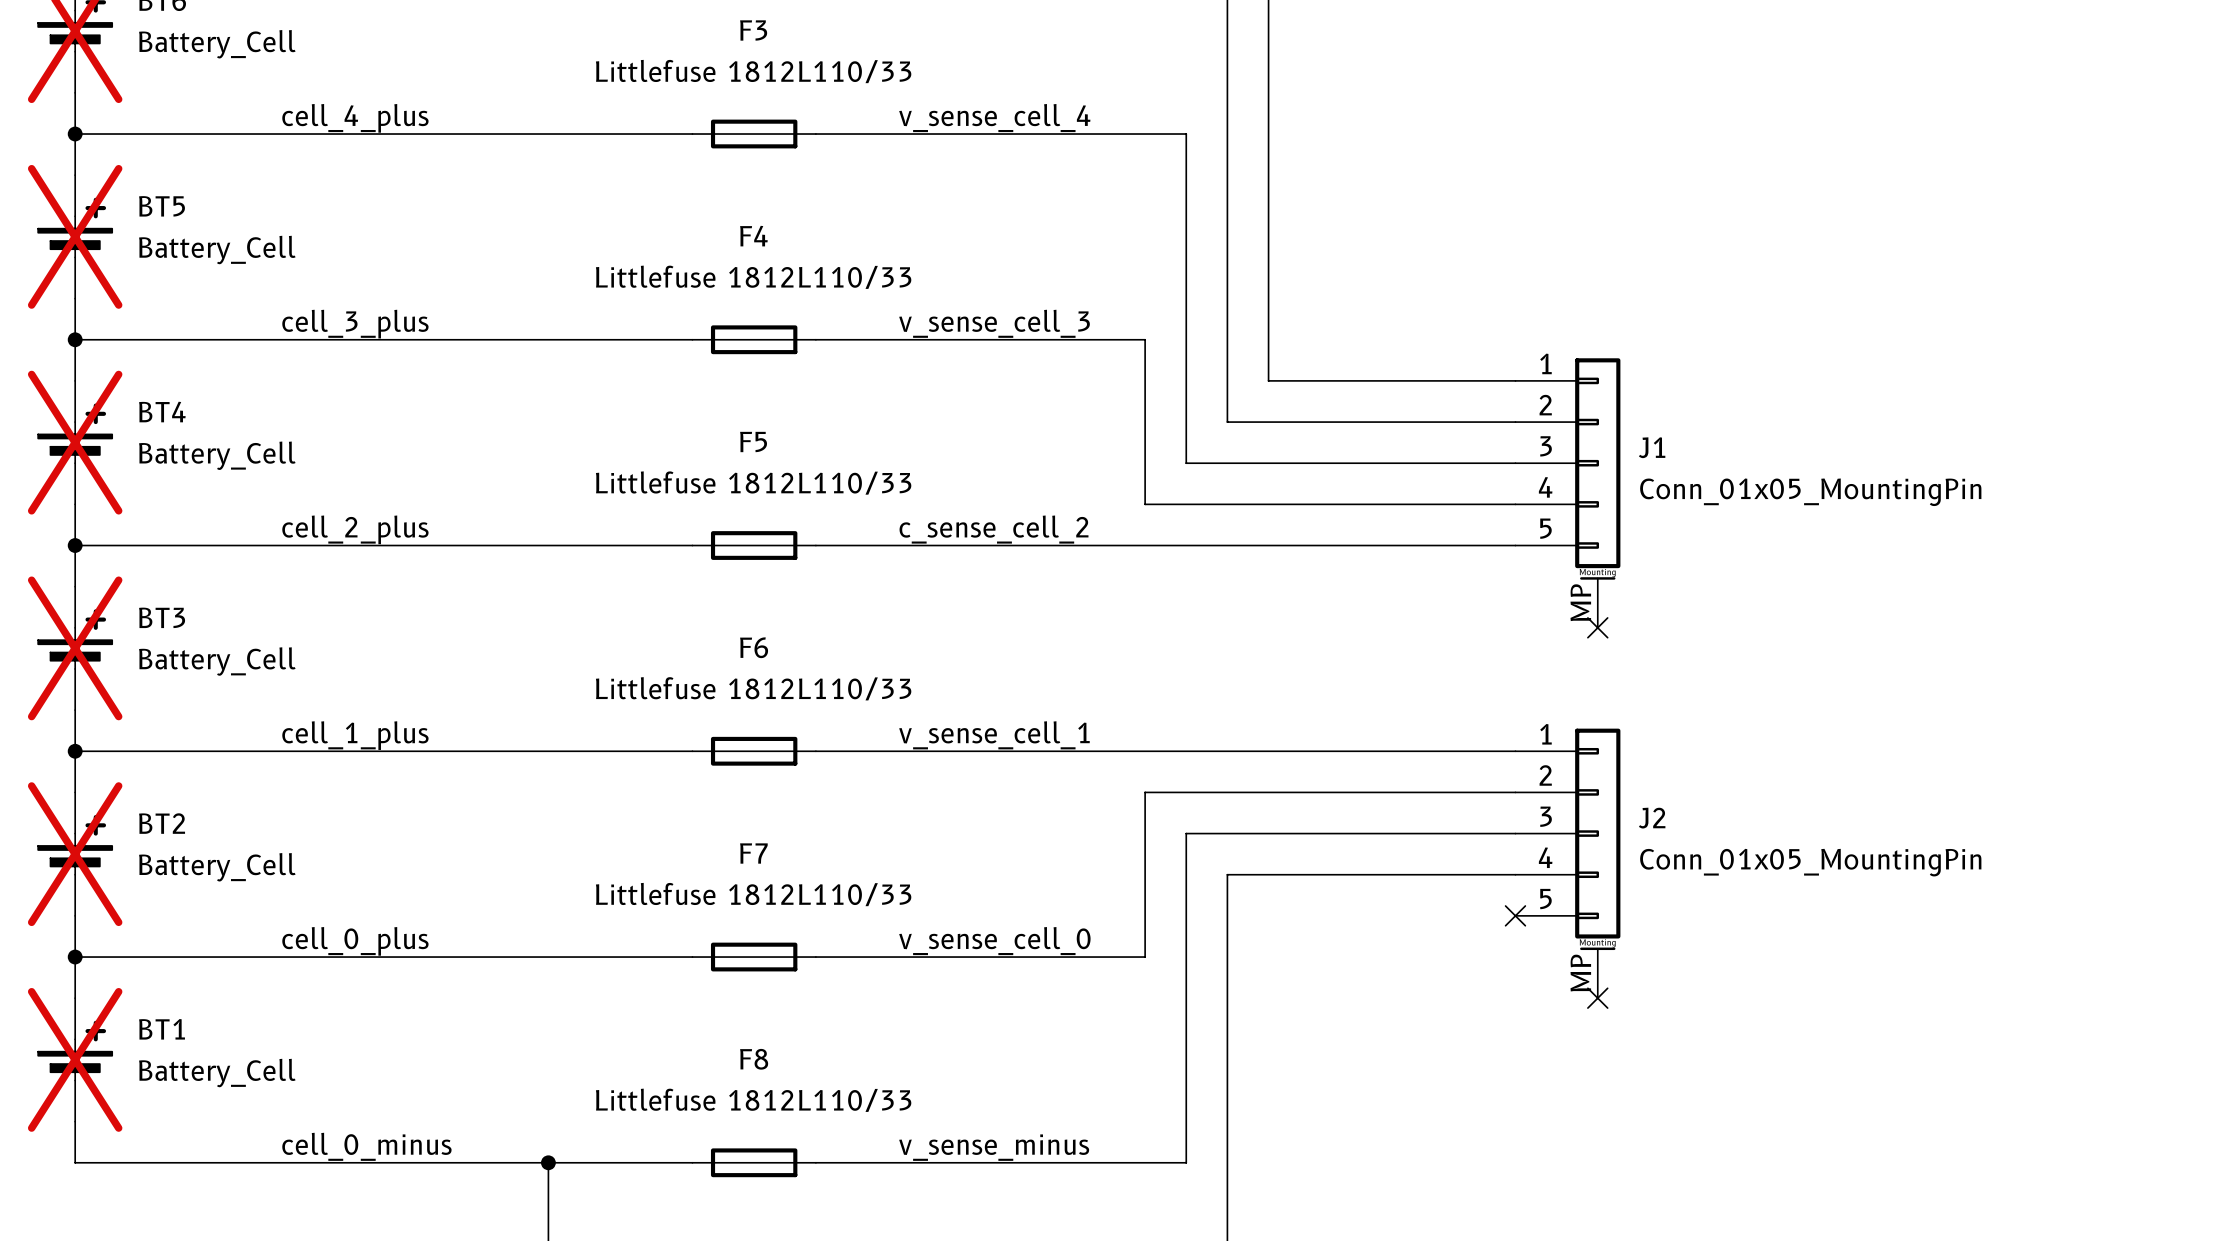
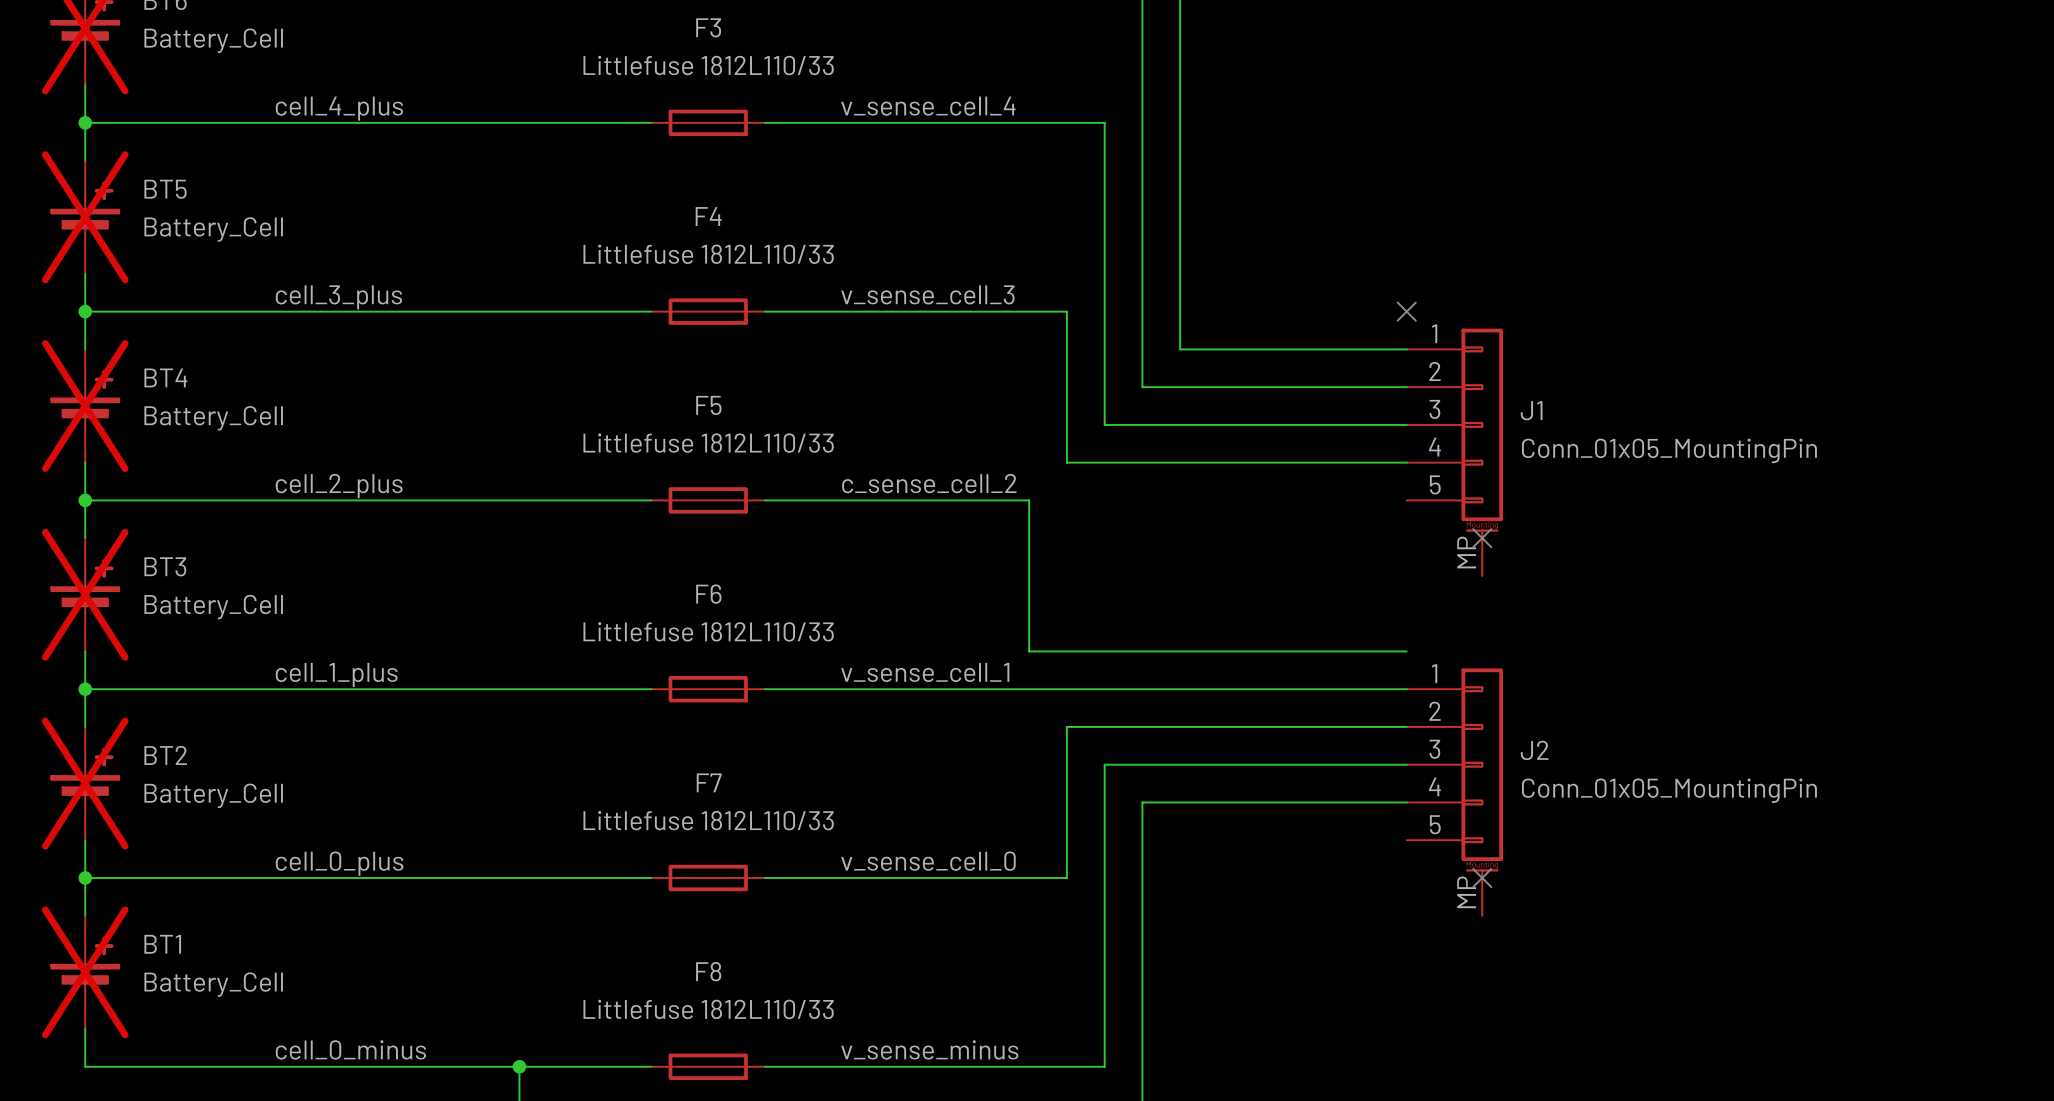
no-connect mark: none -> (1406, 311)
wire: (1103, 545) (1515, 545) -> (1029, 500) (1029, 651) (1406, 651)
no-connect mark position: (1597, 627) -> (1482, 538)
no-connect mark: (1515, 915) -> none
no-connect mark position: (1597, 998) -> (1482, 877)

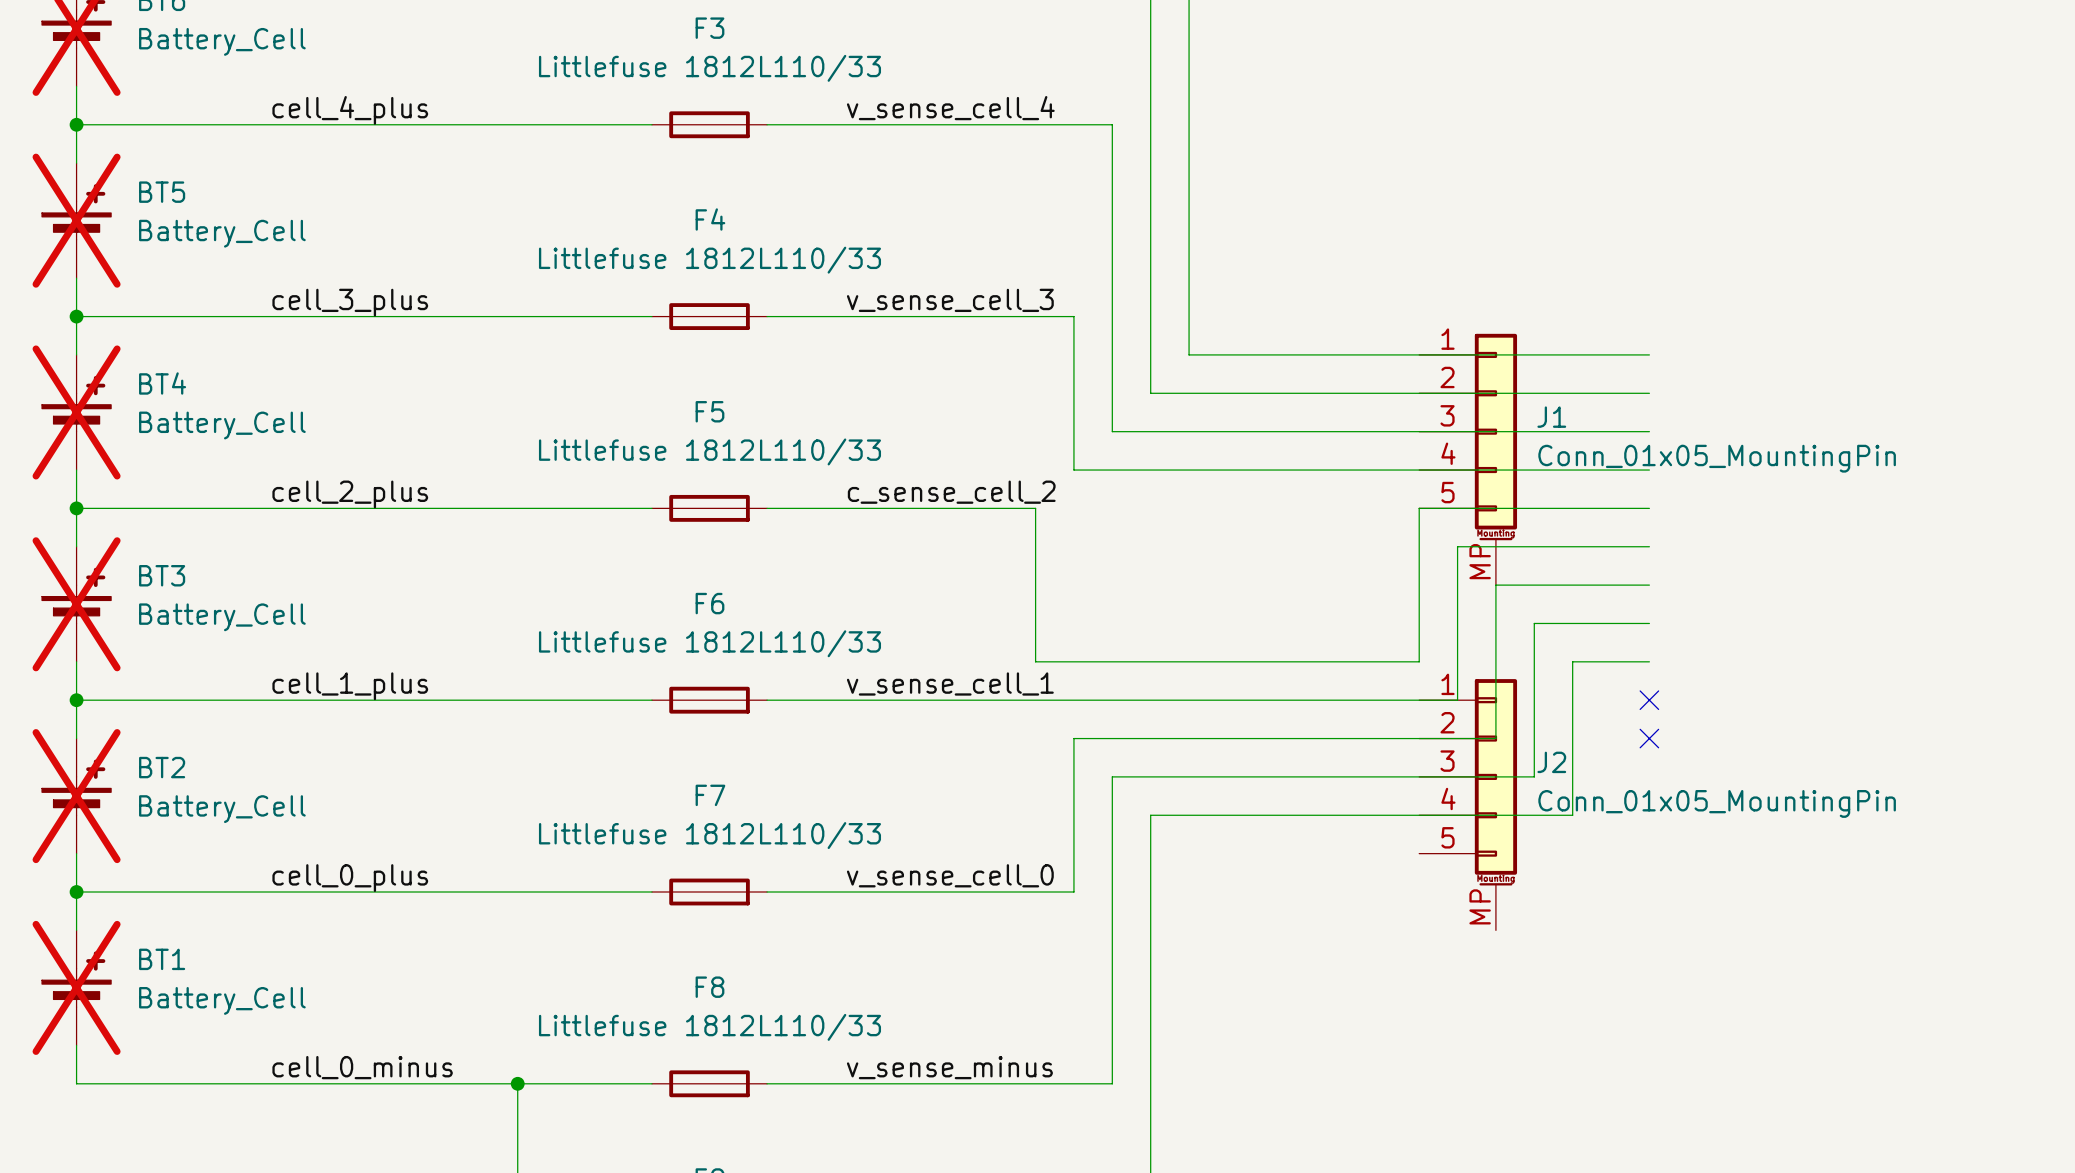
no-connect mark: (1406, 311) -> none
wire: none -> (1419, 354) (1649, 354)
wire: none -> (1419, 393) (1649, 393)
wire: none -> (1419, 431) (1649, 431)
wire: none -> (1419, 470) (1649, 470)
wire: none -> (1649, 508) (1419, 508) (1419, 661)
no-connect mark: (1482, 538) -> none
wire: none -> (1649, 546) (1457, 546) (1457, 700) (1419, 700)
wire: none -> (1649, 585) (1495, 585) (1495, 738) (1419, 738)
wire: none -> (1649, 623) (1534, 623) (1534, 776) (1419, 776)
wire: none -> (1649, 661) (1572, 661) (1572, 815) (1419, 815)
no-connect mark: none -> (1649, 700)
no-connect mark: none -> (1649, 738)
no-connect mark: (1482, 877) -> none

